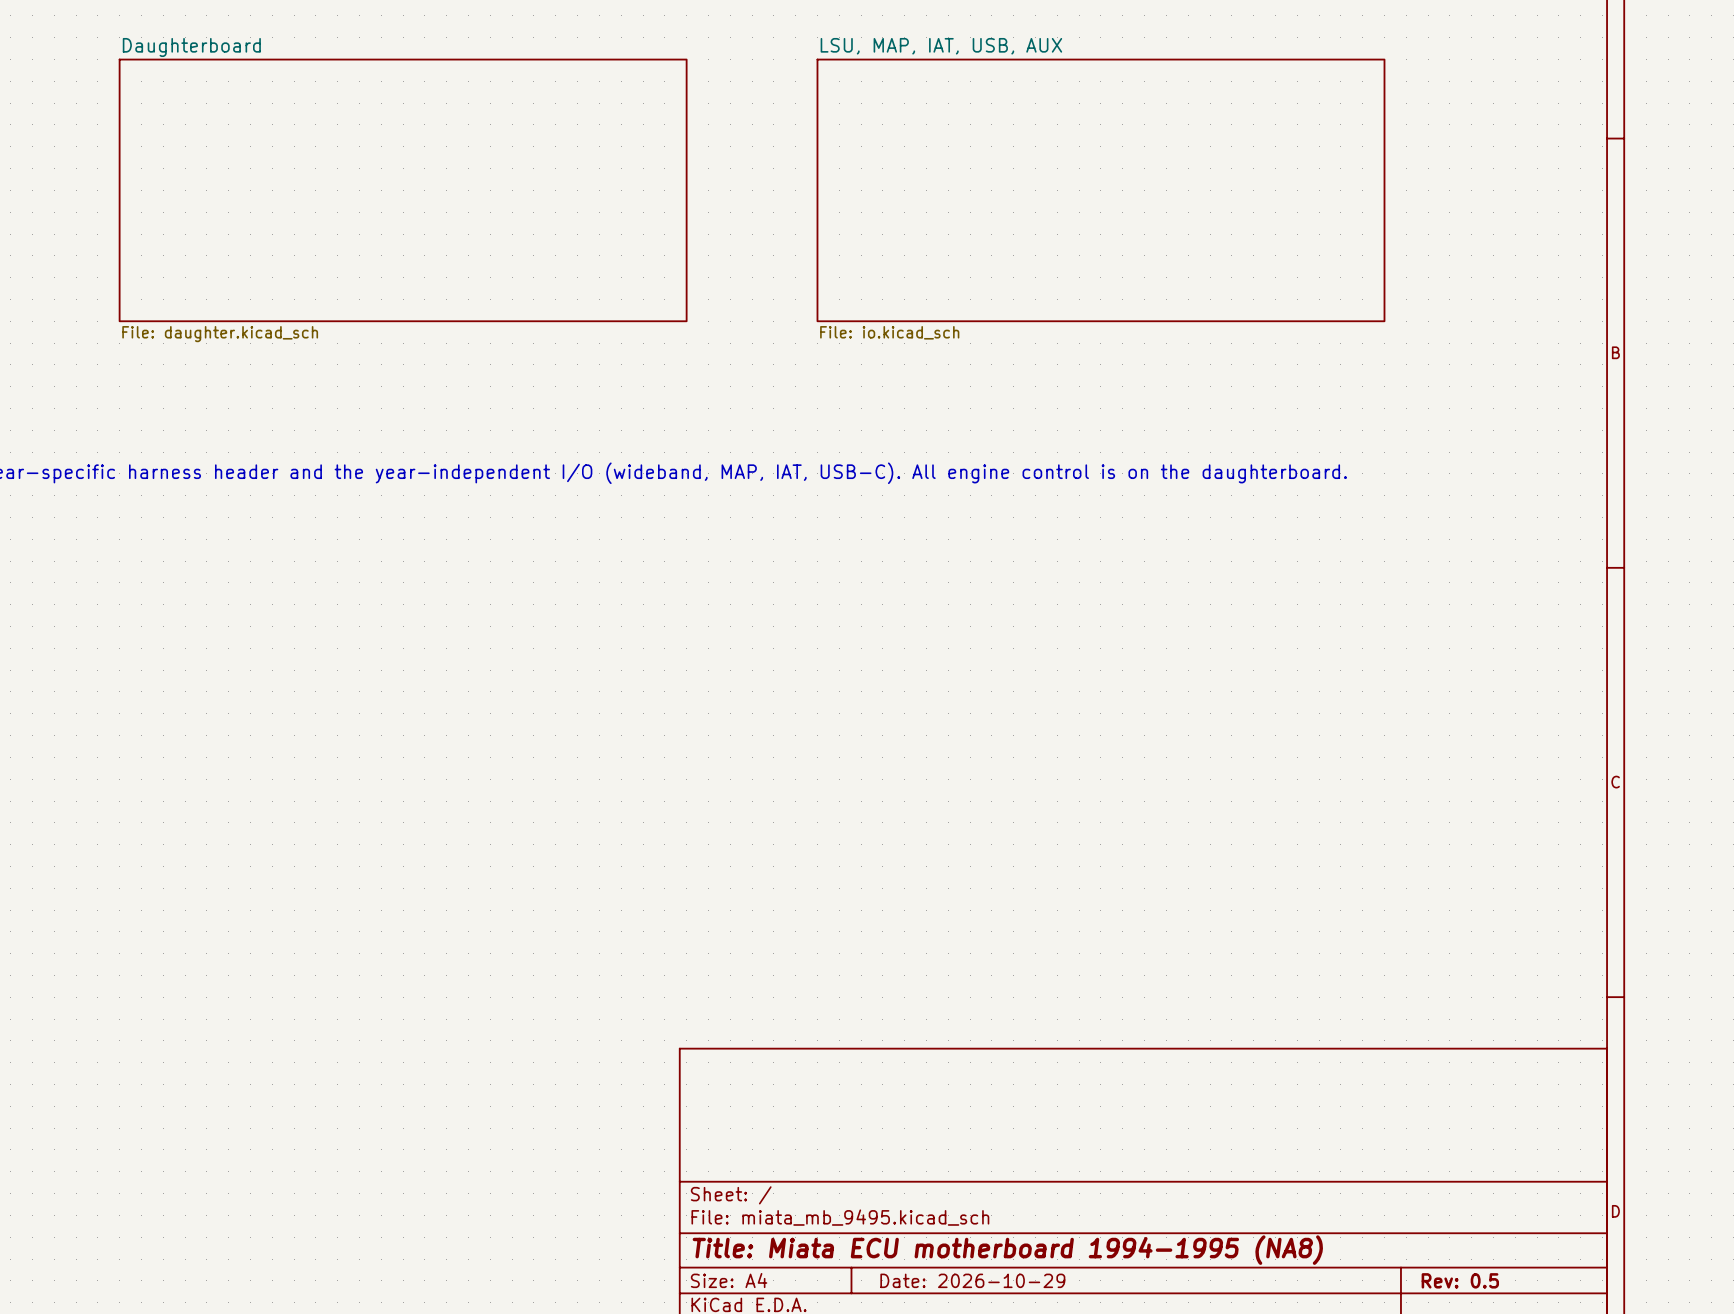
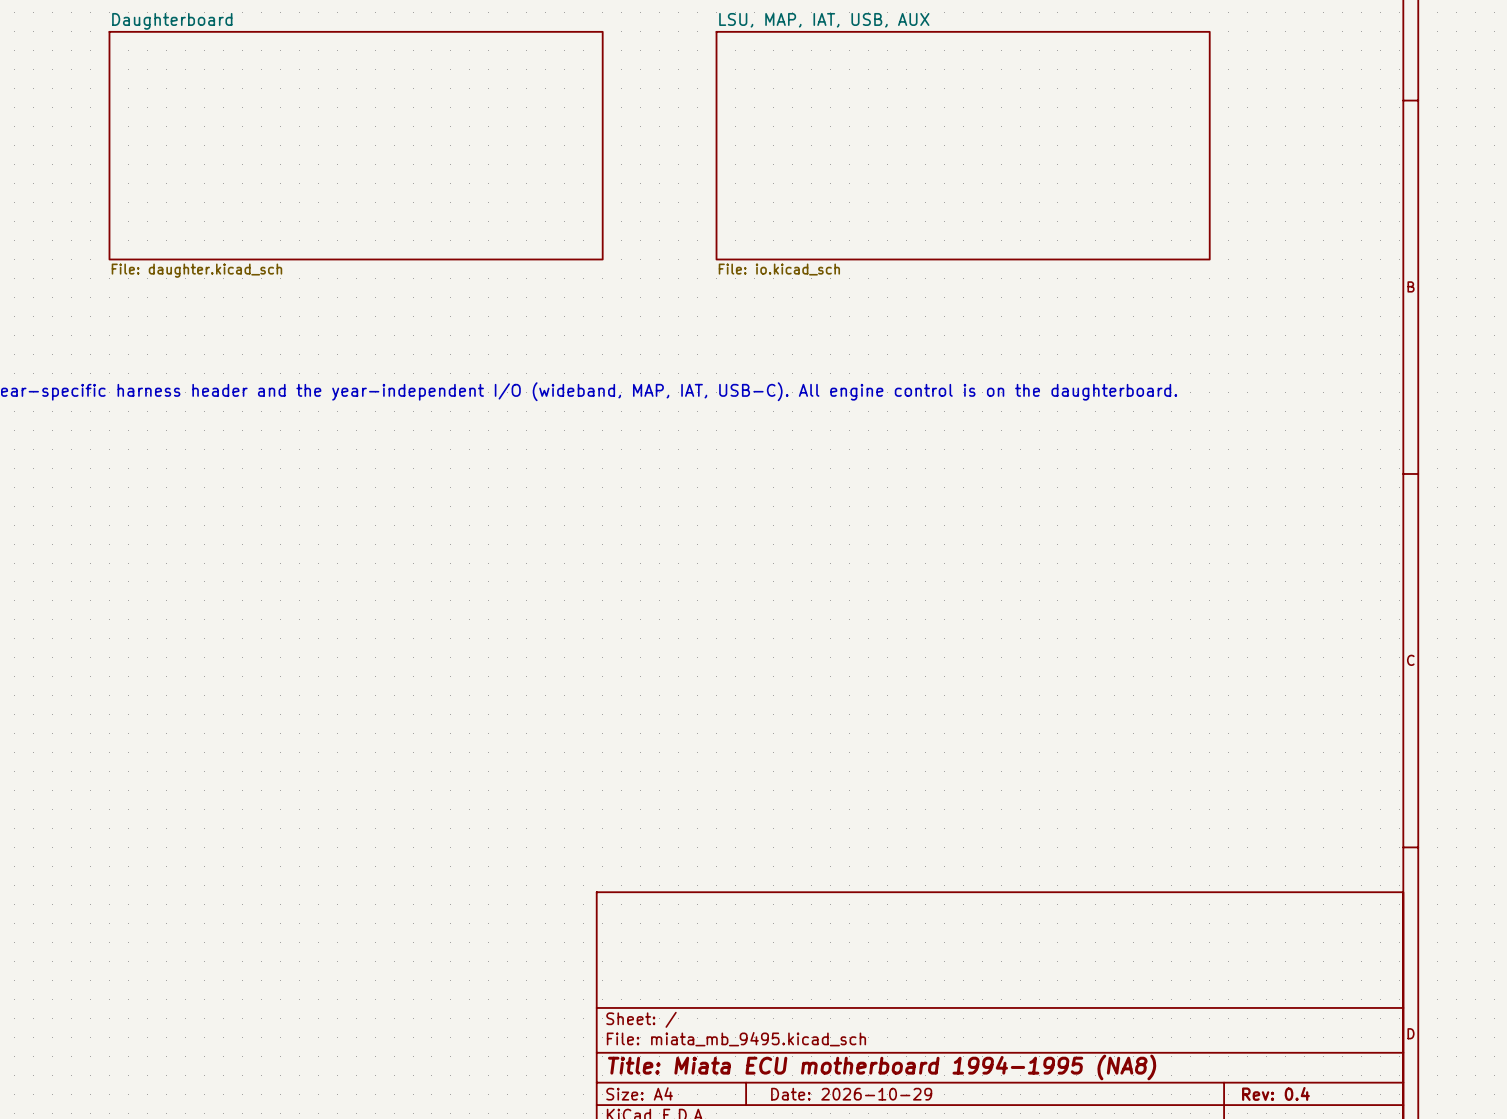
title block: Rev: 0.5 (1460, 1280) -> Rev: 0.4 (1275, 1093)

